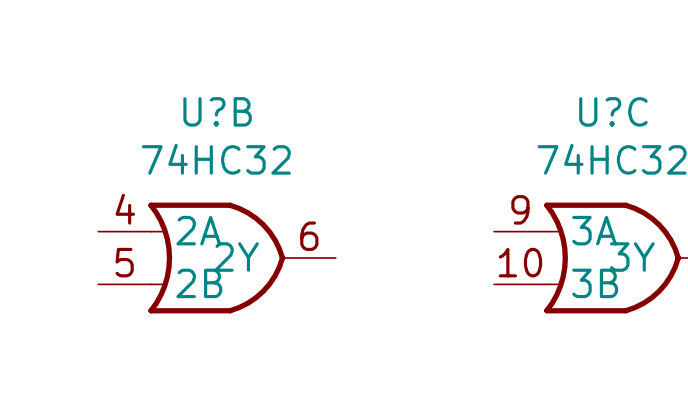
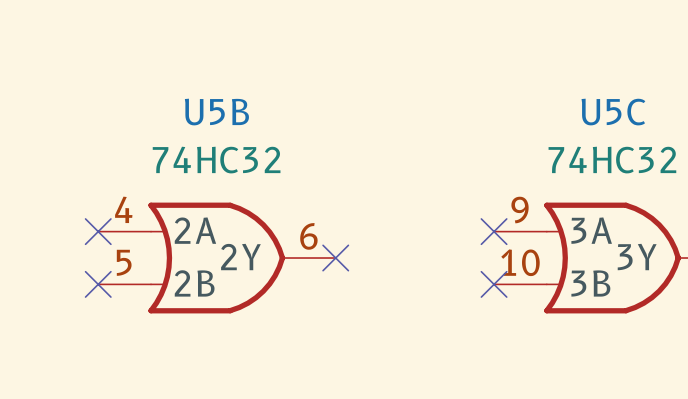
U?B name: U?B (217, 111) -> U5B (216, 112)
U?C name: U?C (613, 111) -> U5C (613, 112)
no-connect mark: none -> (98, 231)
no-connect mark: none -> (494, 231)
no-connect mark: none -> (335, 258)
no-connect mark: none -> (98, 284)
no-connect mark: none -> (494, 284)

